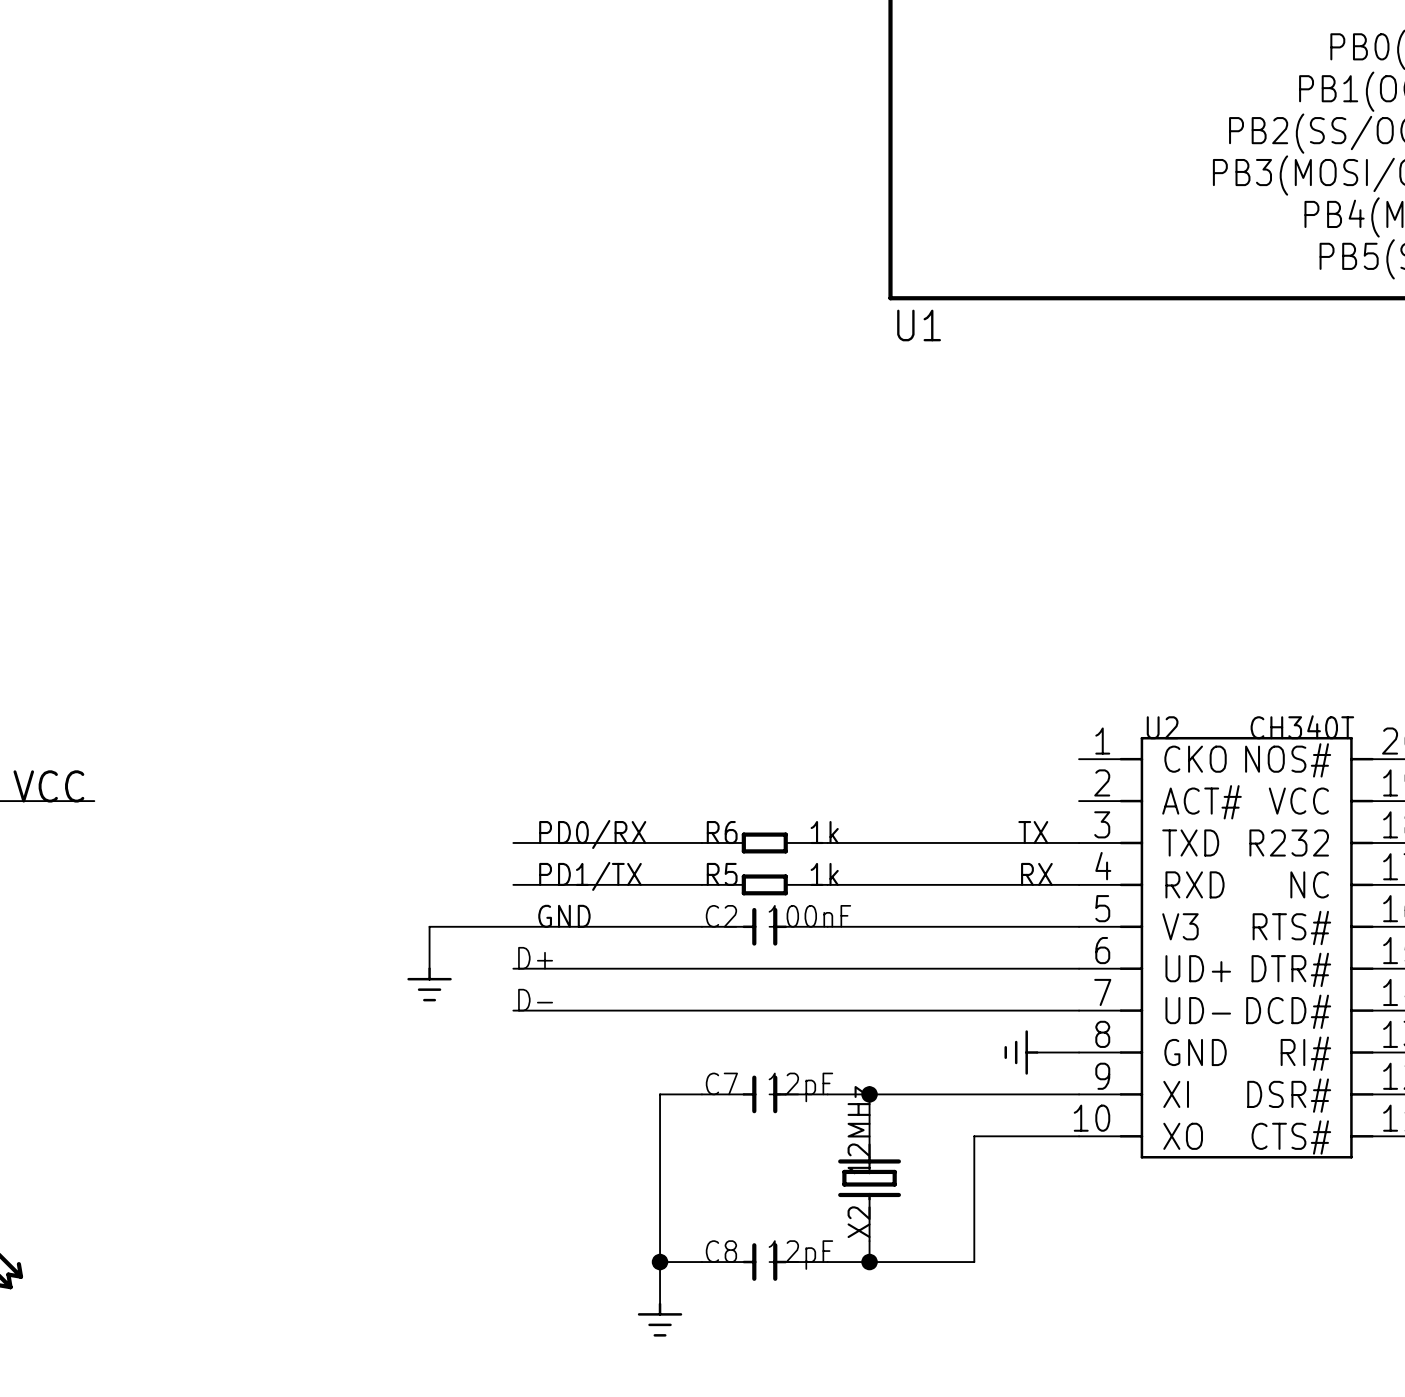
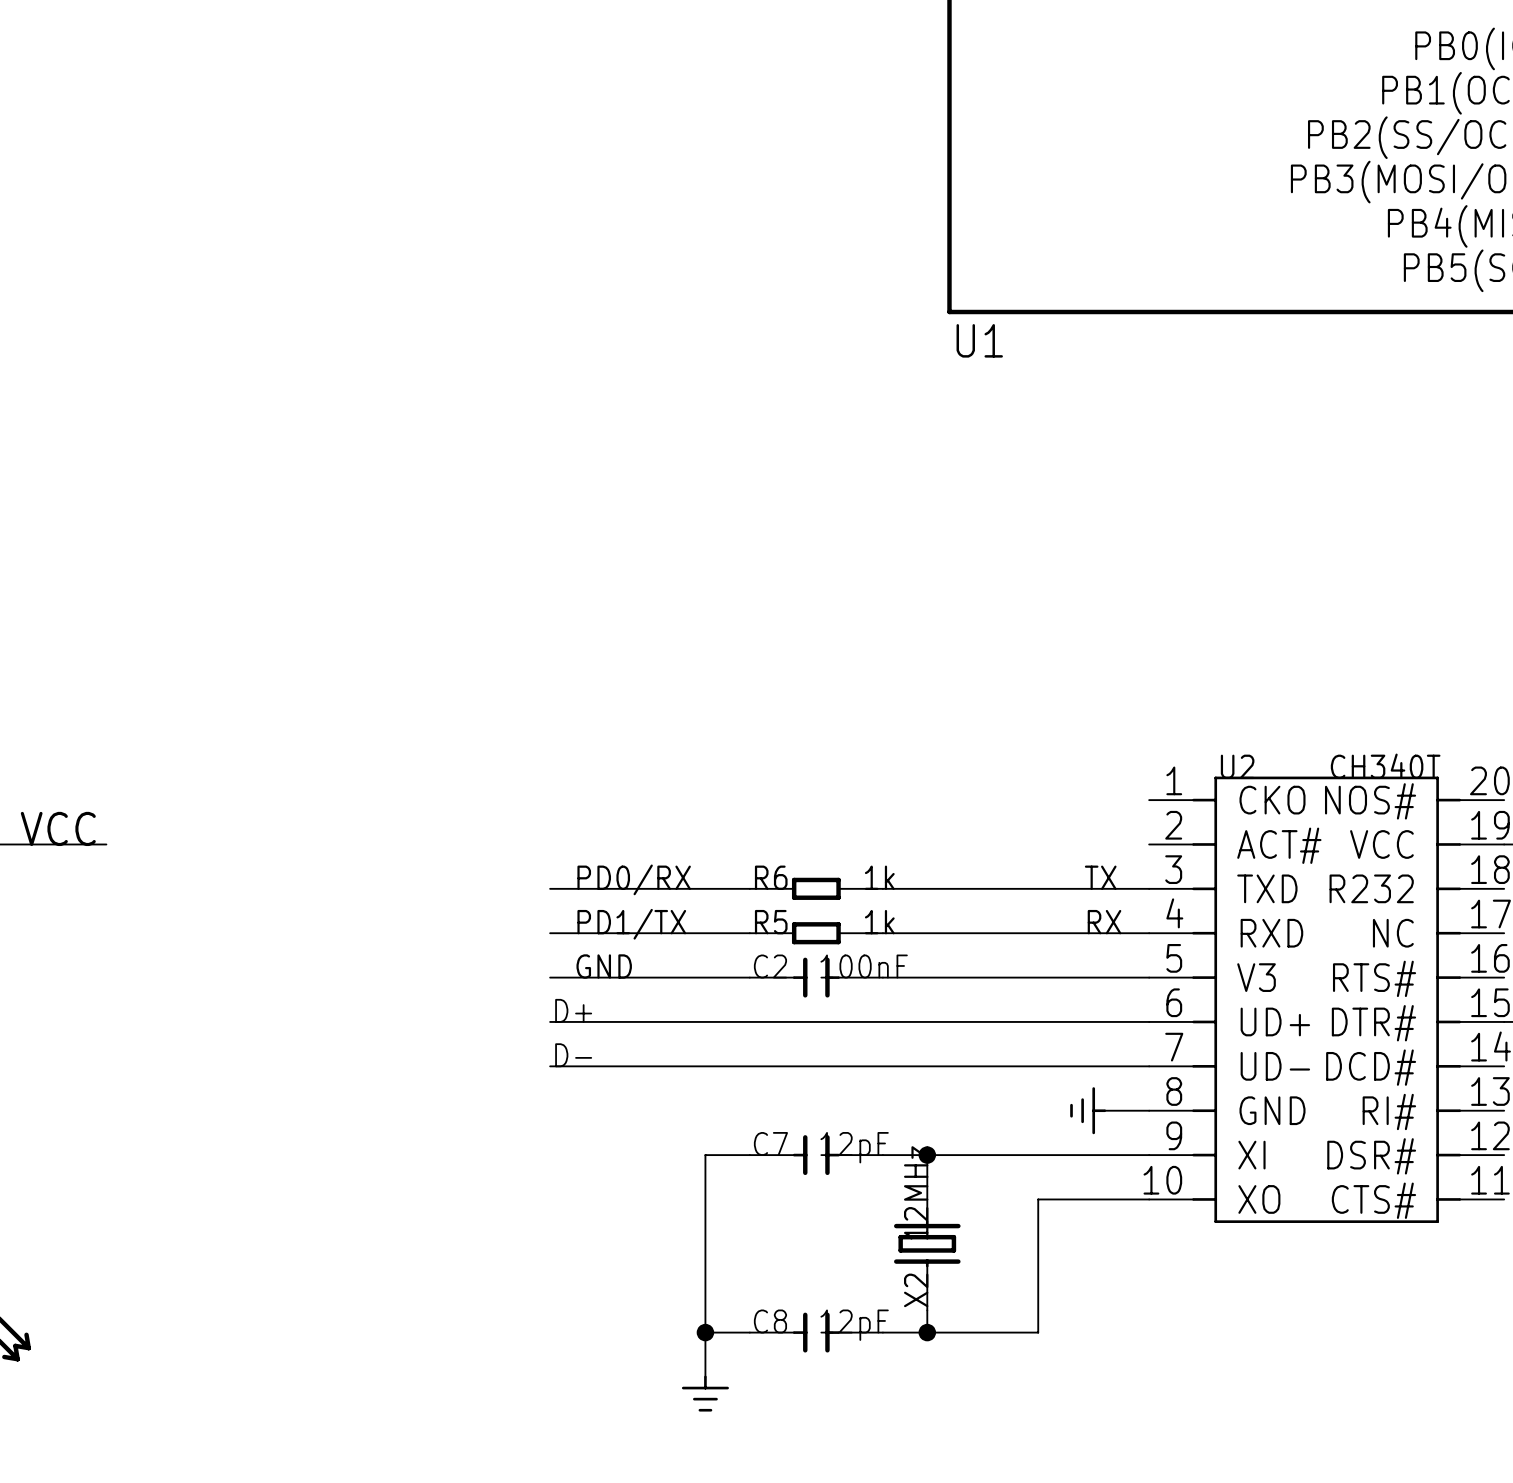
wire: (513, 926) (429, 926) (429, 968) -> none
power symbol: (429, 984) -> none

